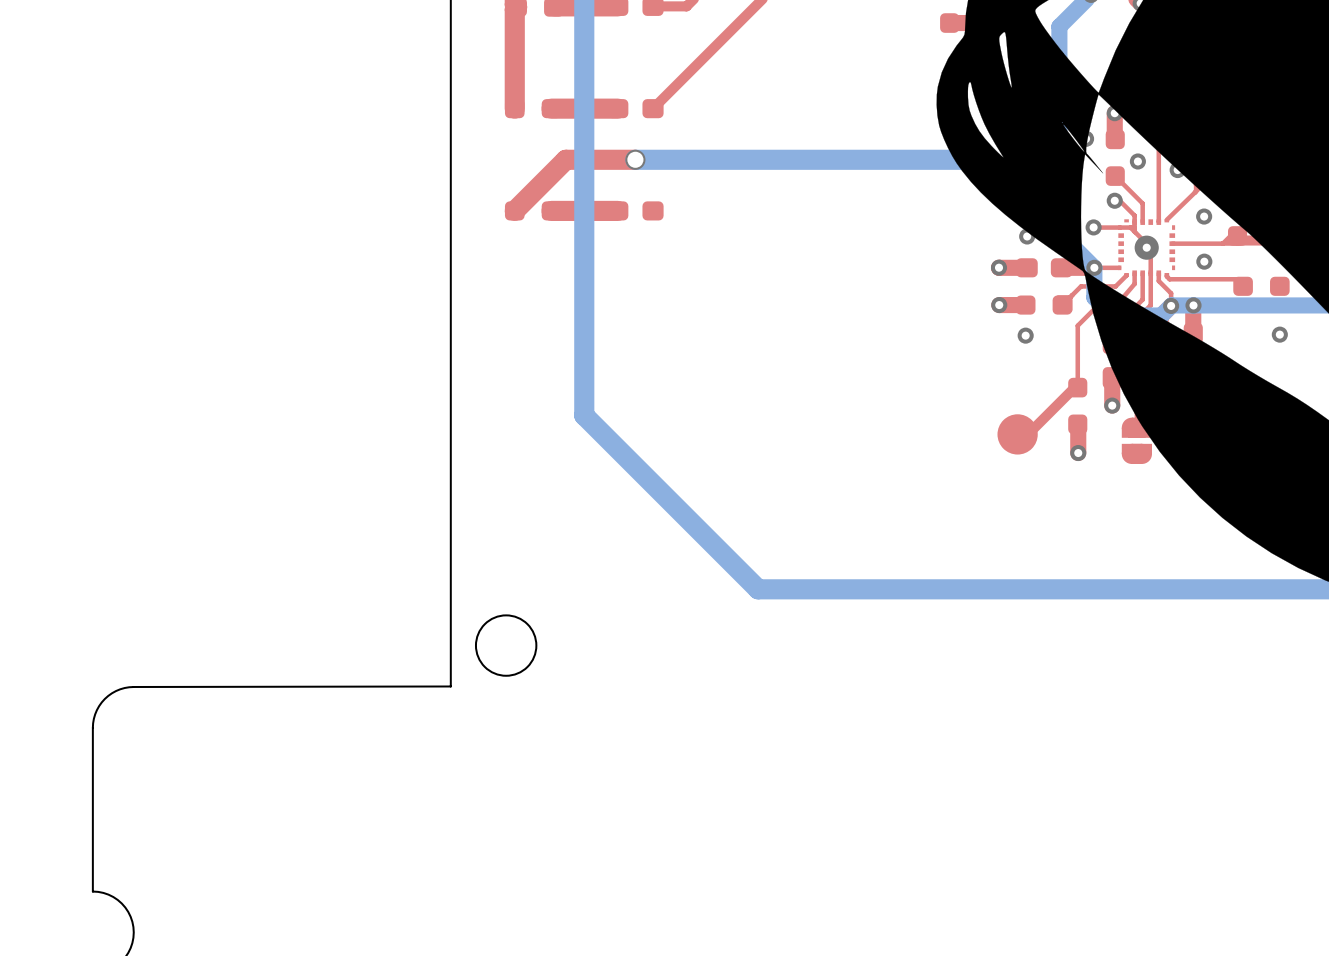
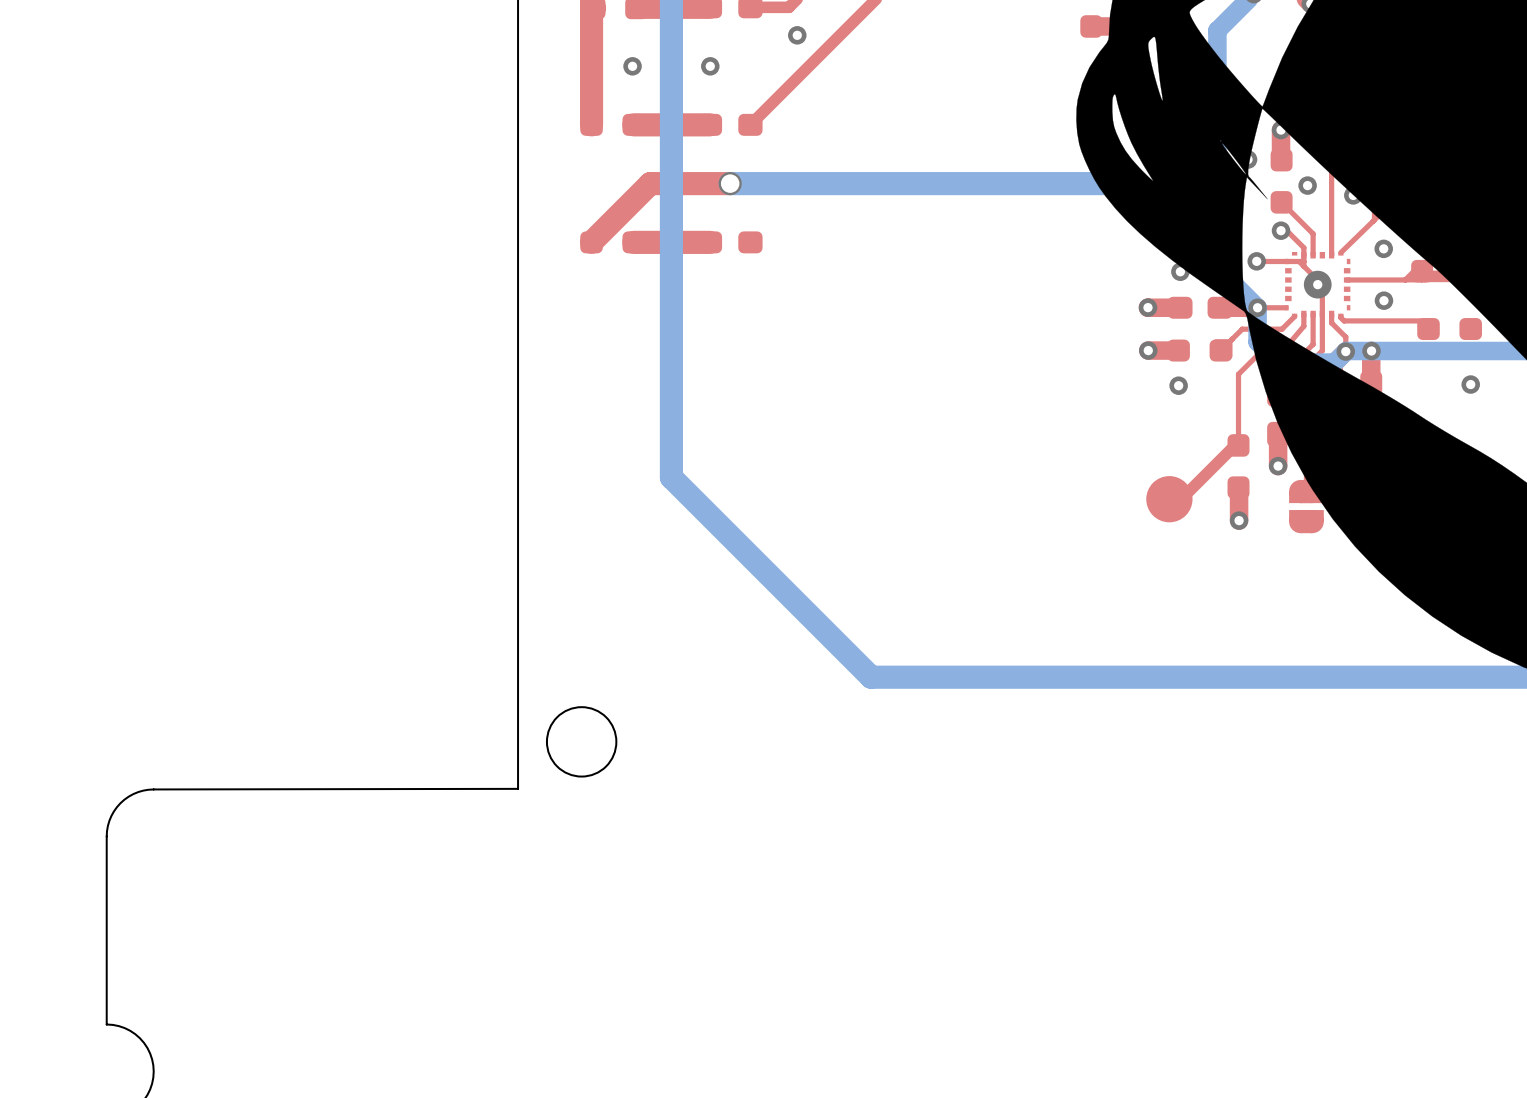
via: none -> (797, 35)
via: none -> (632, 66)
via: none -> (710, 66)

